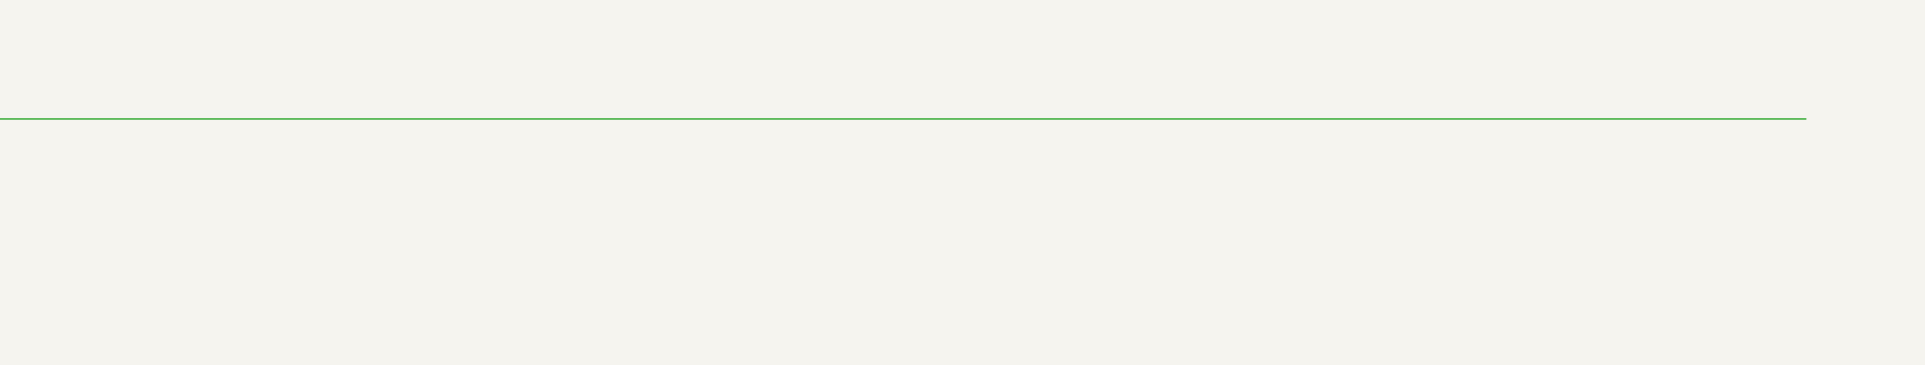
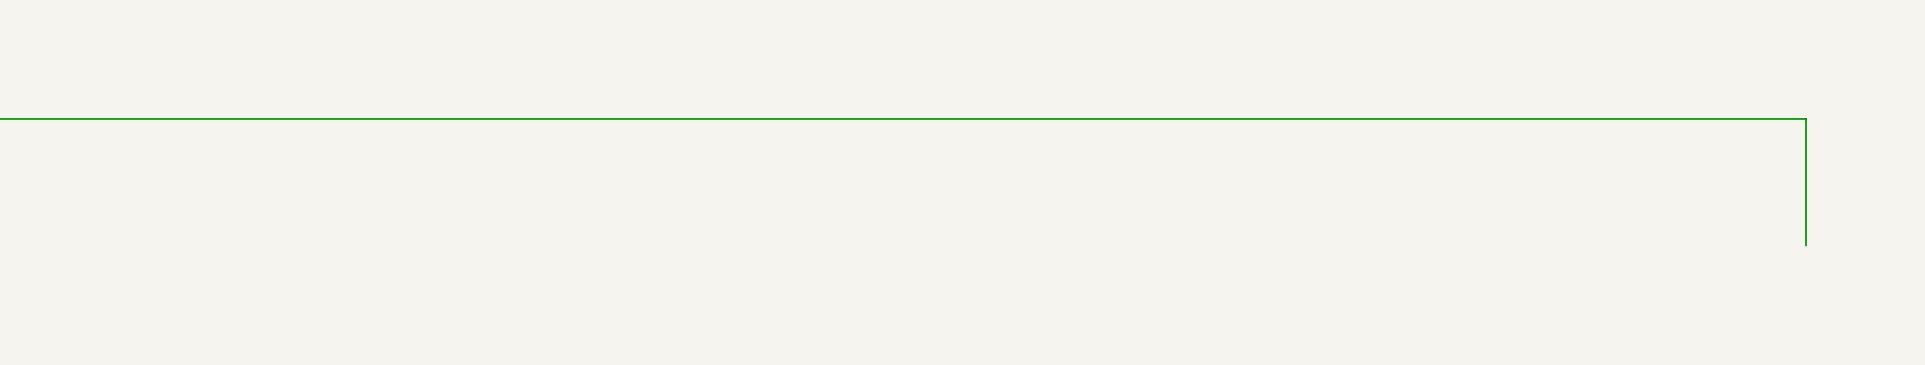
wire: none -> (1805, 118) (1805, 245)

